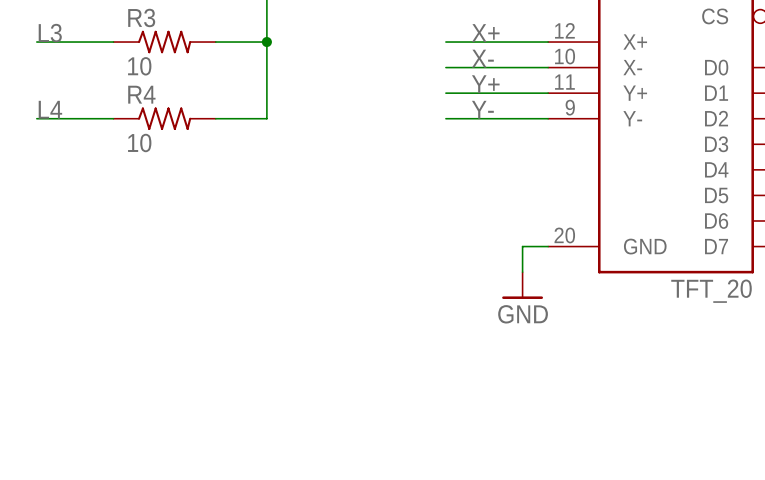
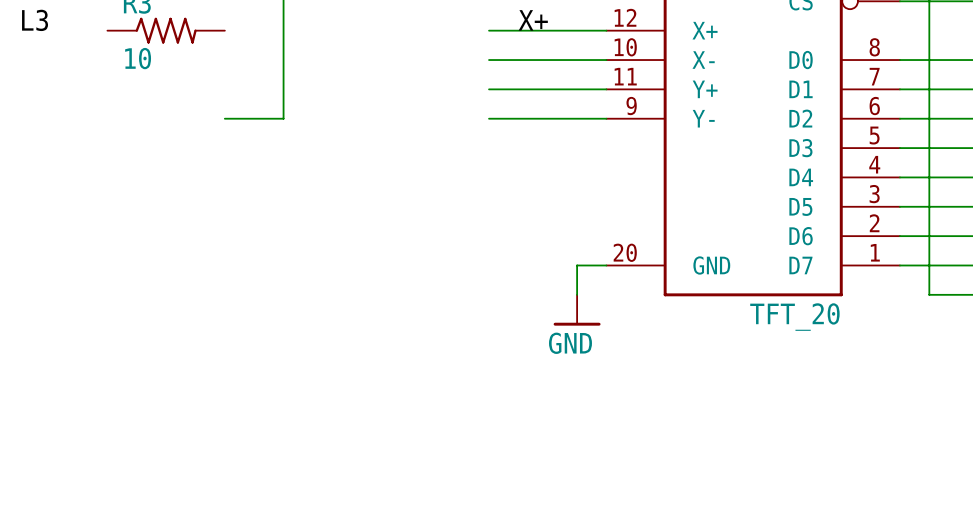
wire: (36, 42) (113, 42) -> none
wire: (215, 42) (266, 42) -> none
junction: (266, 42) -> none
label: X- (482, 58) -> none
label: Y+ (485, 84) -> none
label: L4 (50, 109) -> none
label: Y- (482, 109) -> none
wire: (36, 118) (113, 118) -> none
R4: 10 (164, 118) -> none

